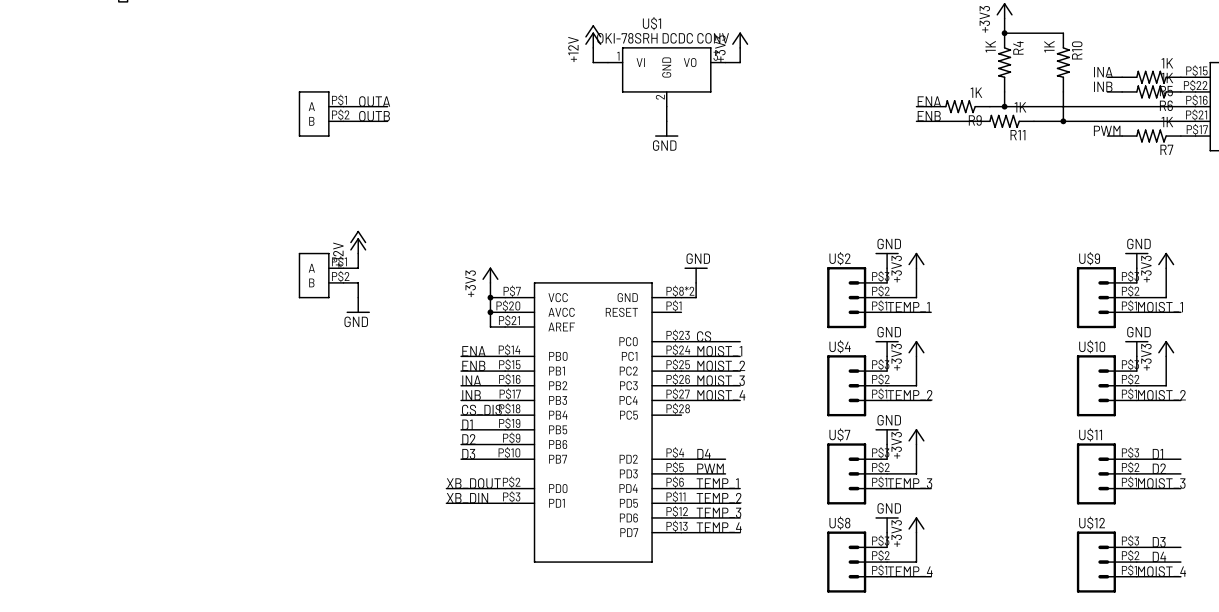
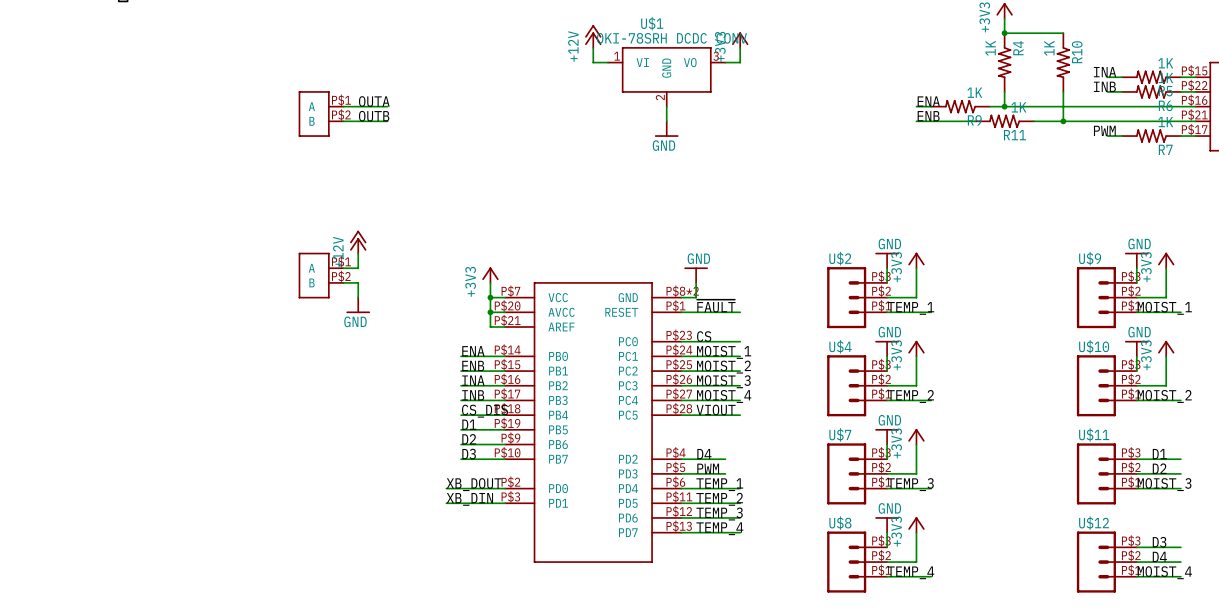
label: none -> ~{FAULT} (716, 306)
wire: none -> (681, 312) (740, 312)
label: none -> VIOUT (716, 410)
wire: none -> (681, 415) (740, 415)

